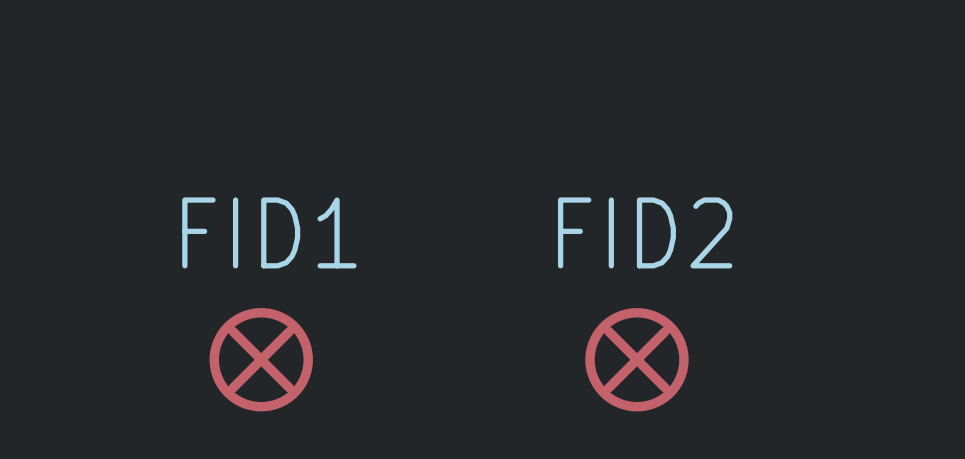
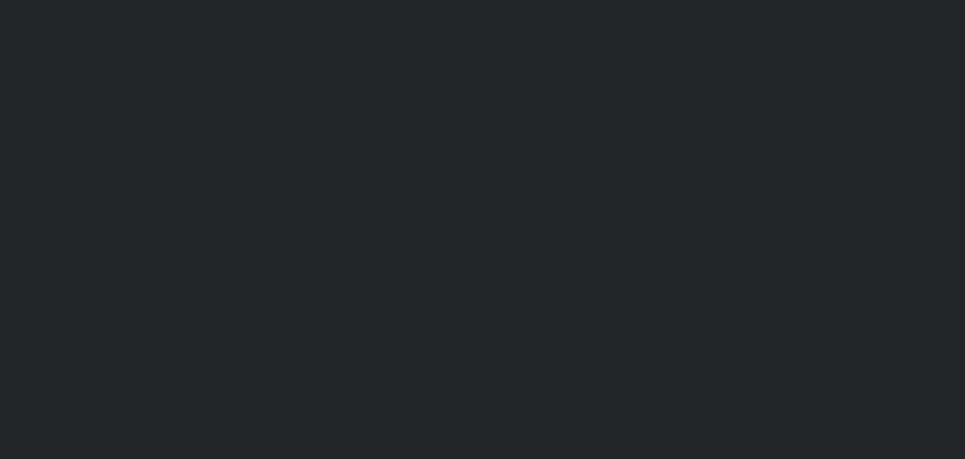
FID1: (261, 359) -> none
FID2: (636, 359) -> none

